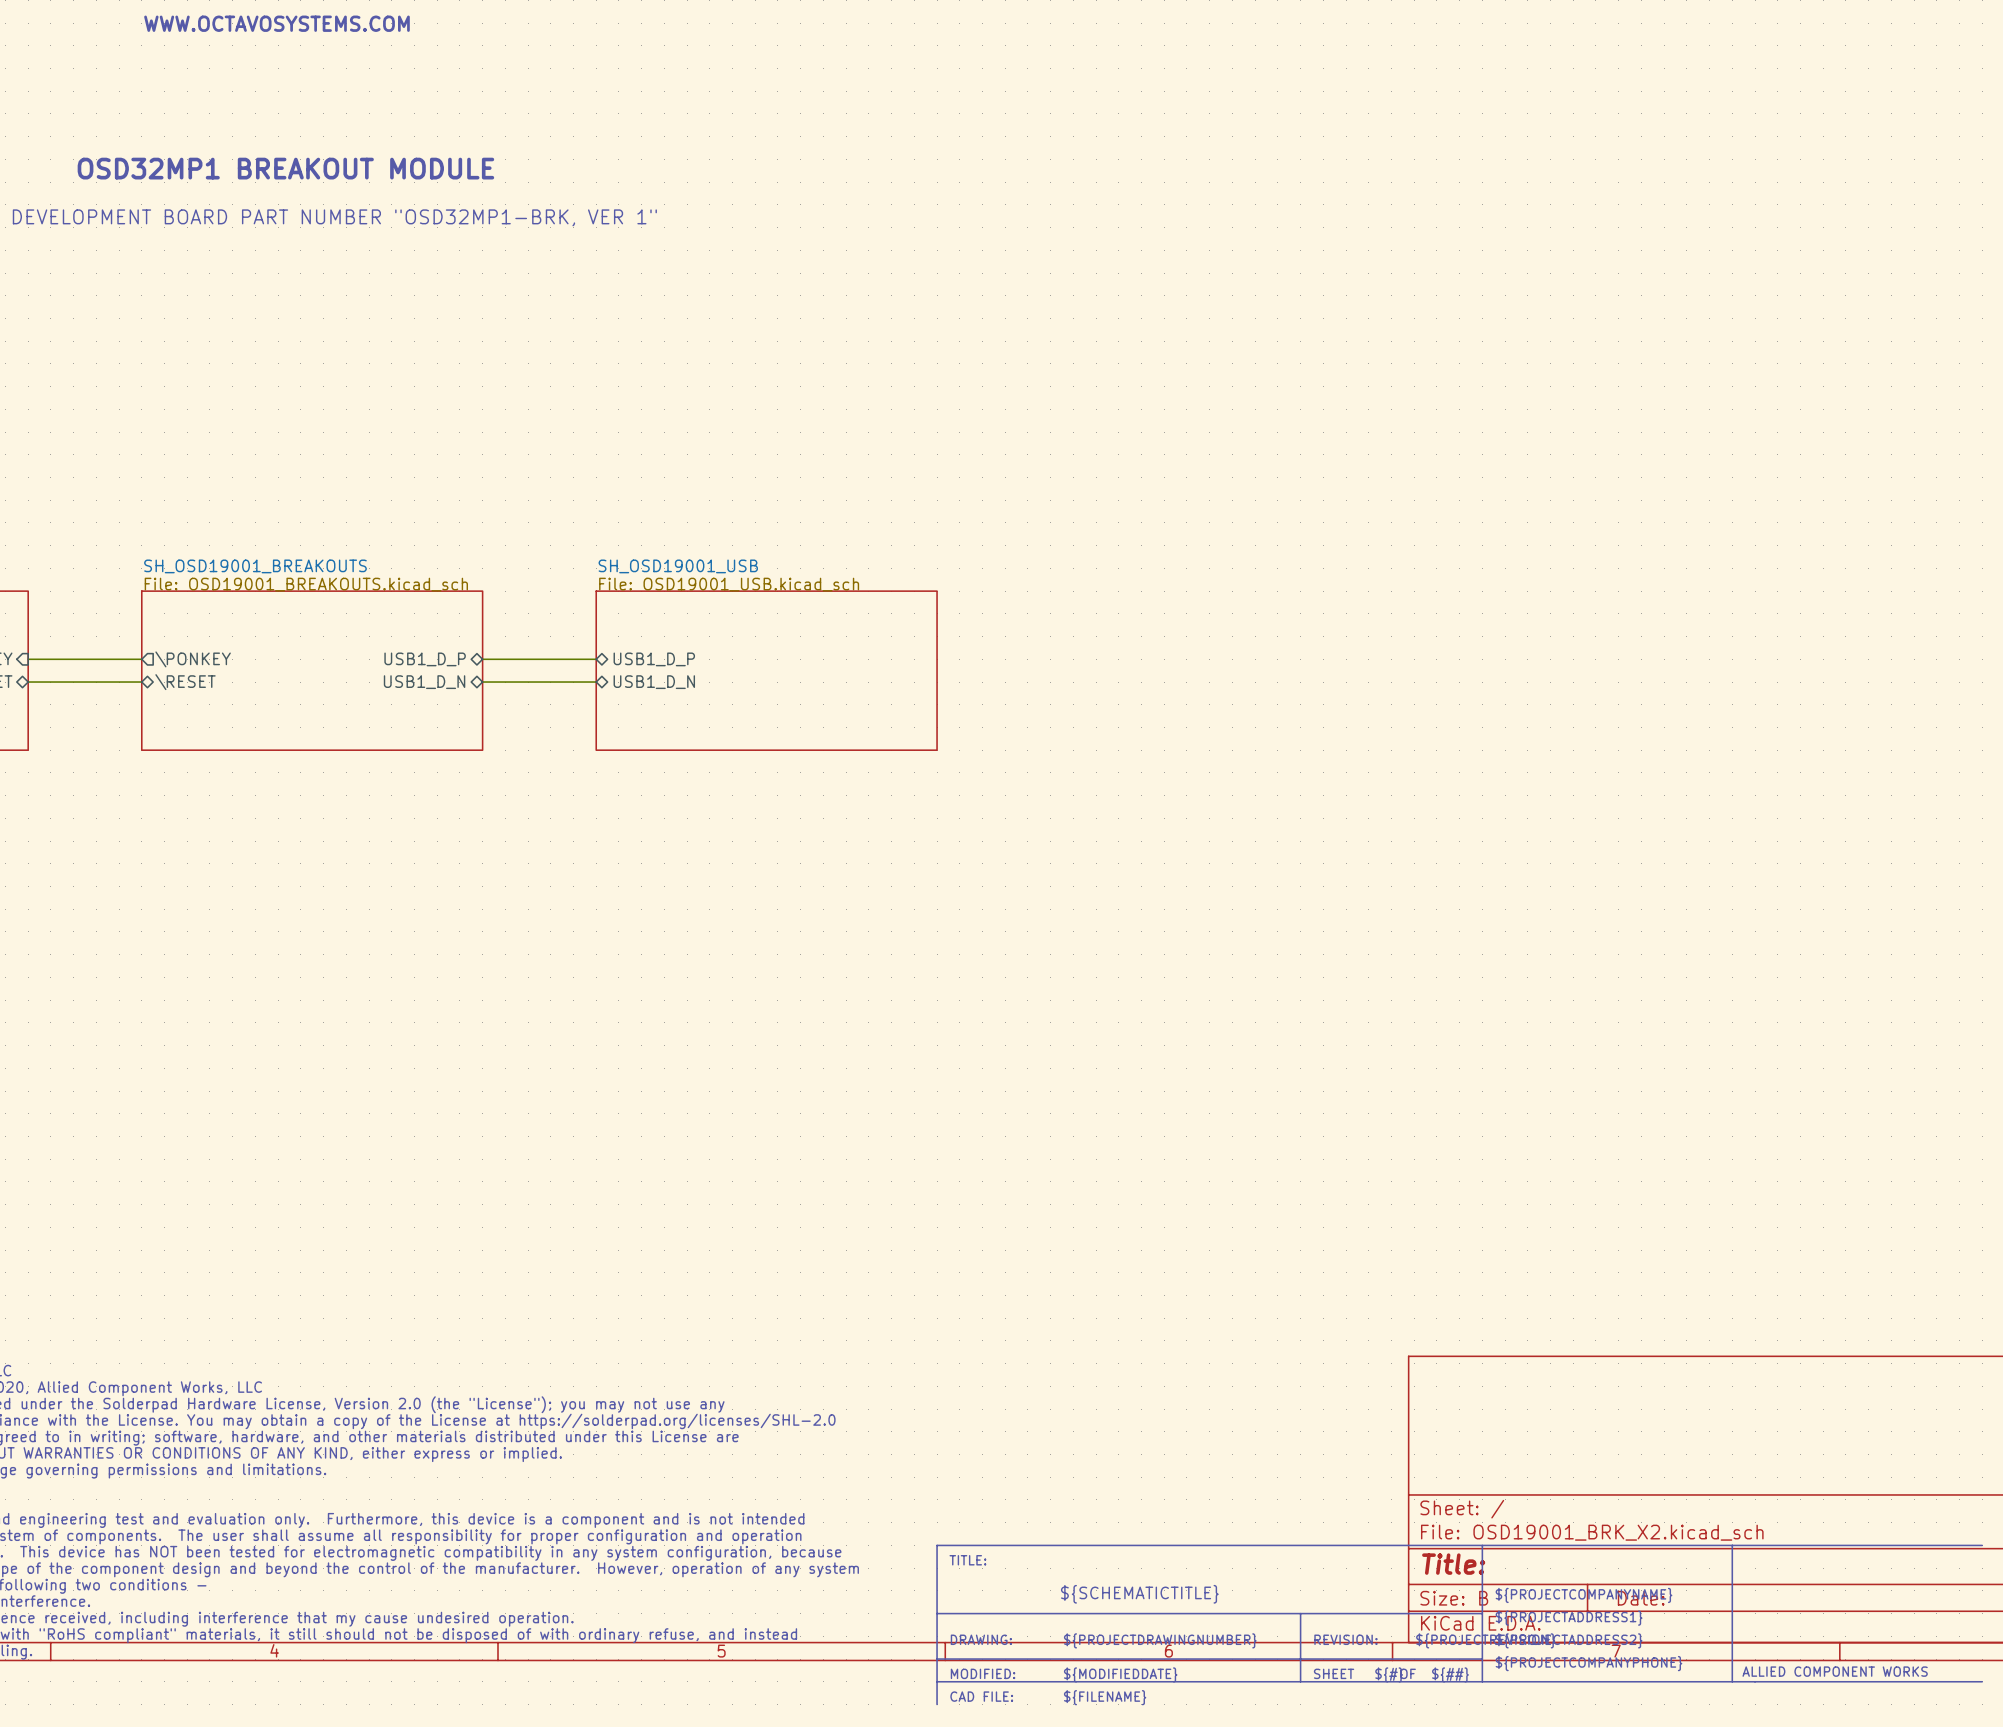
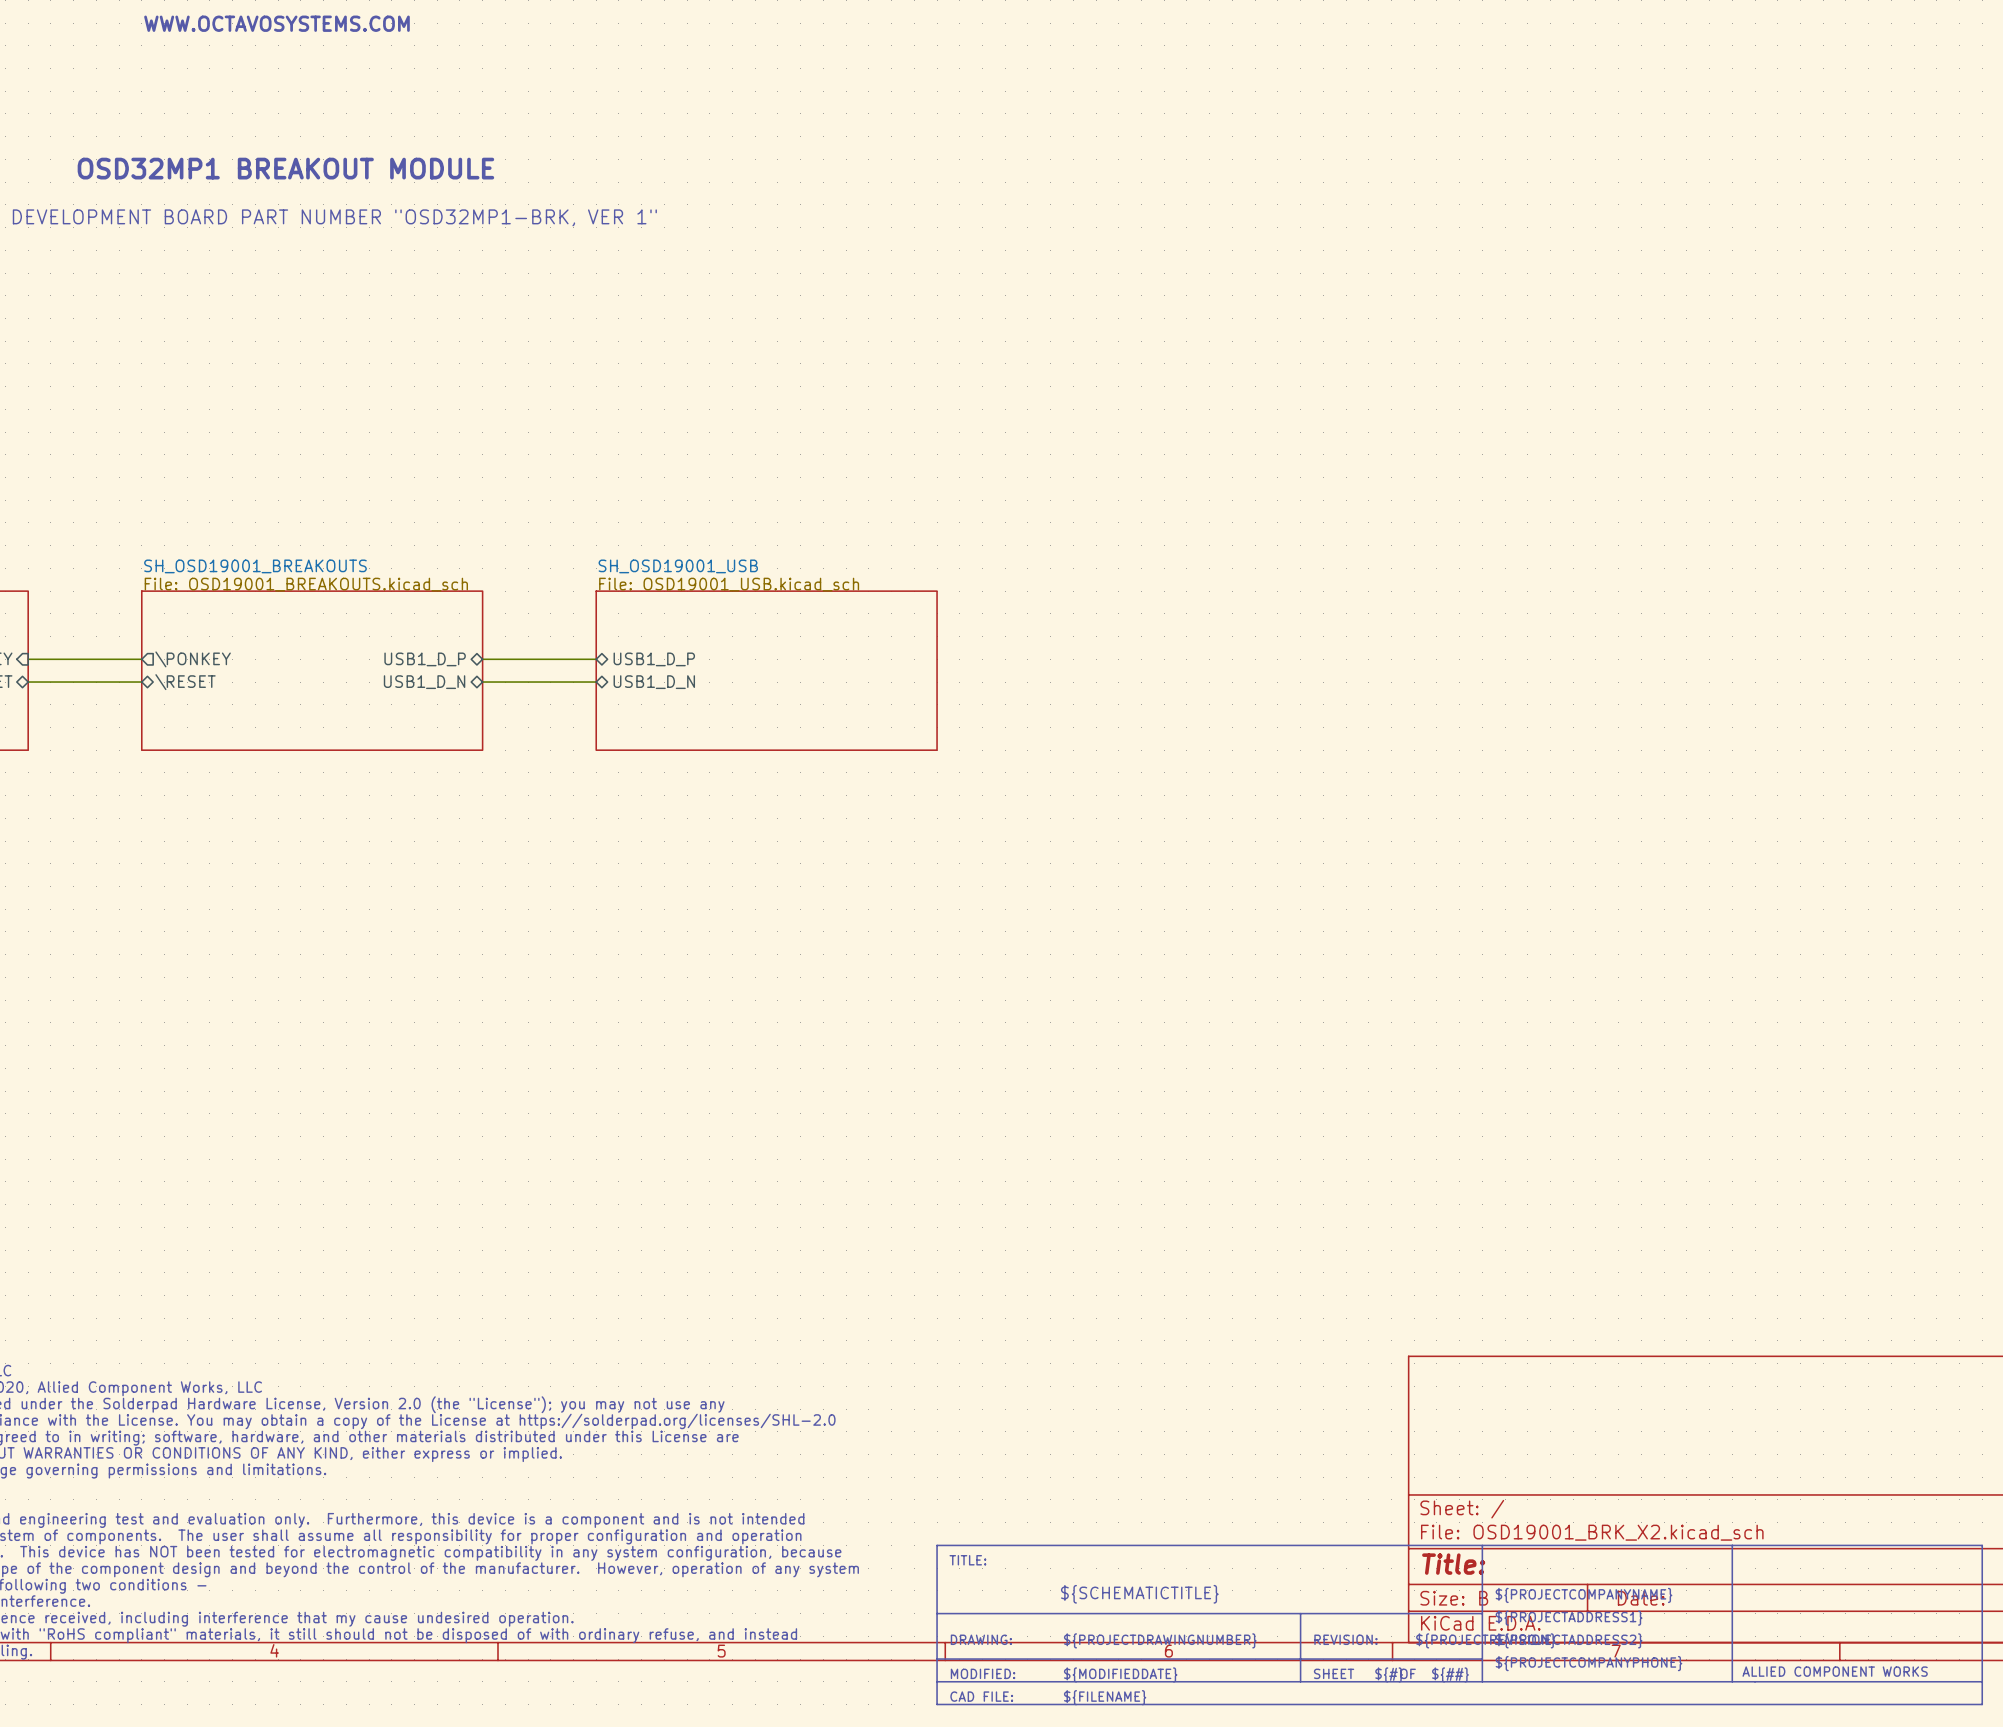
line: none -> (1982, 1545) (1982, 1704) (937, 1704)

